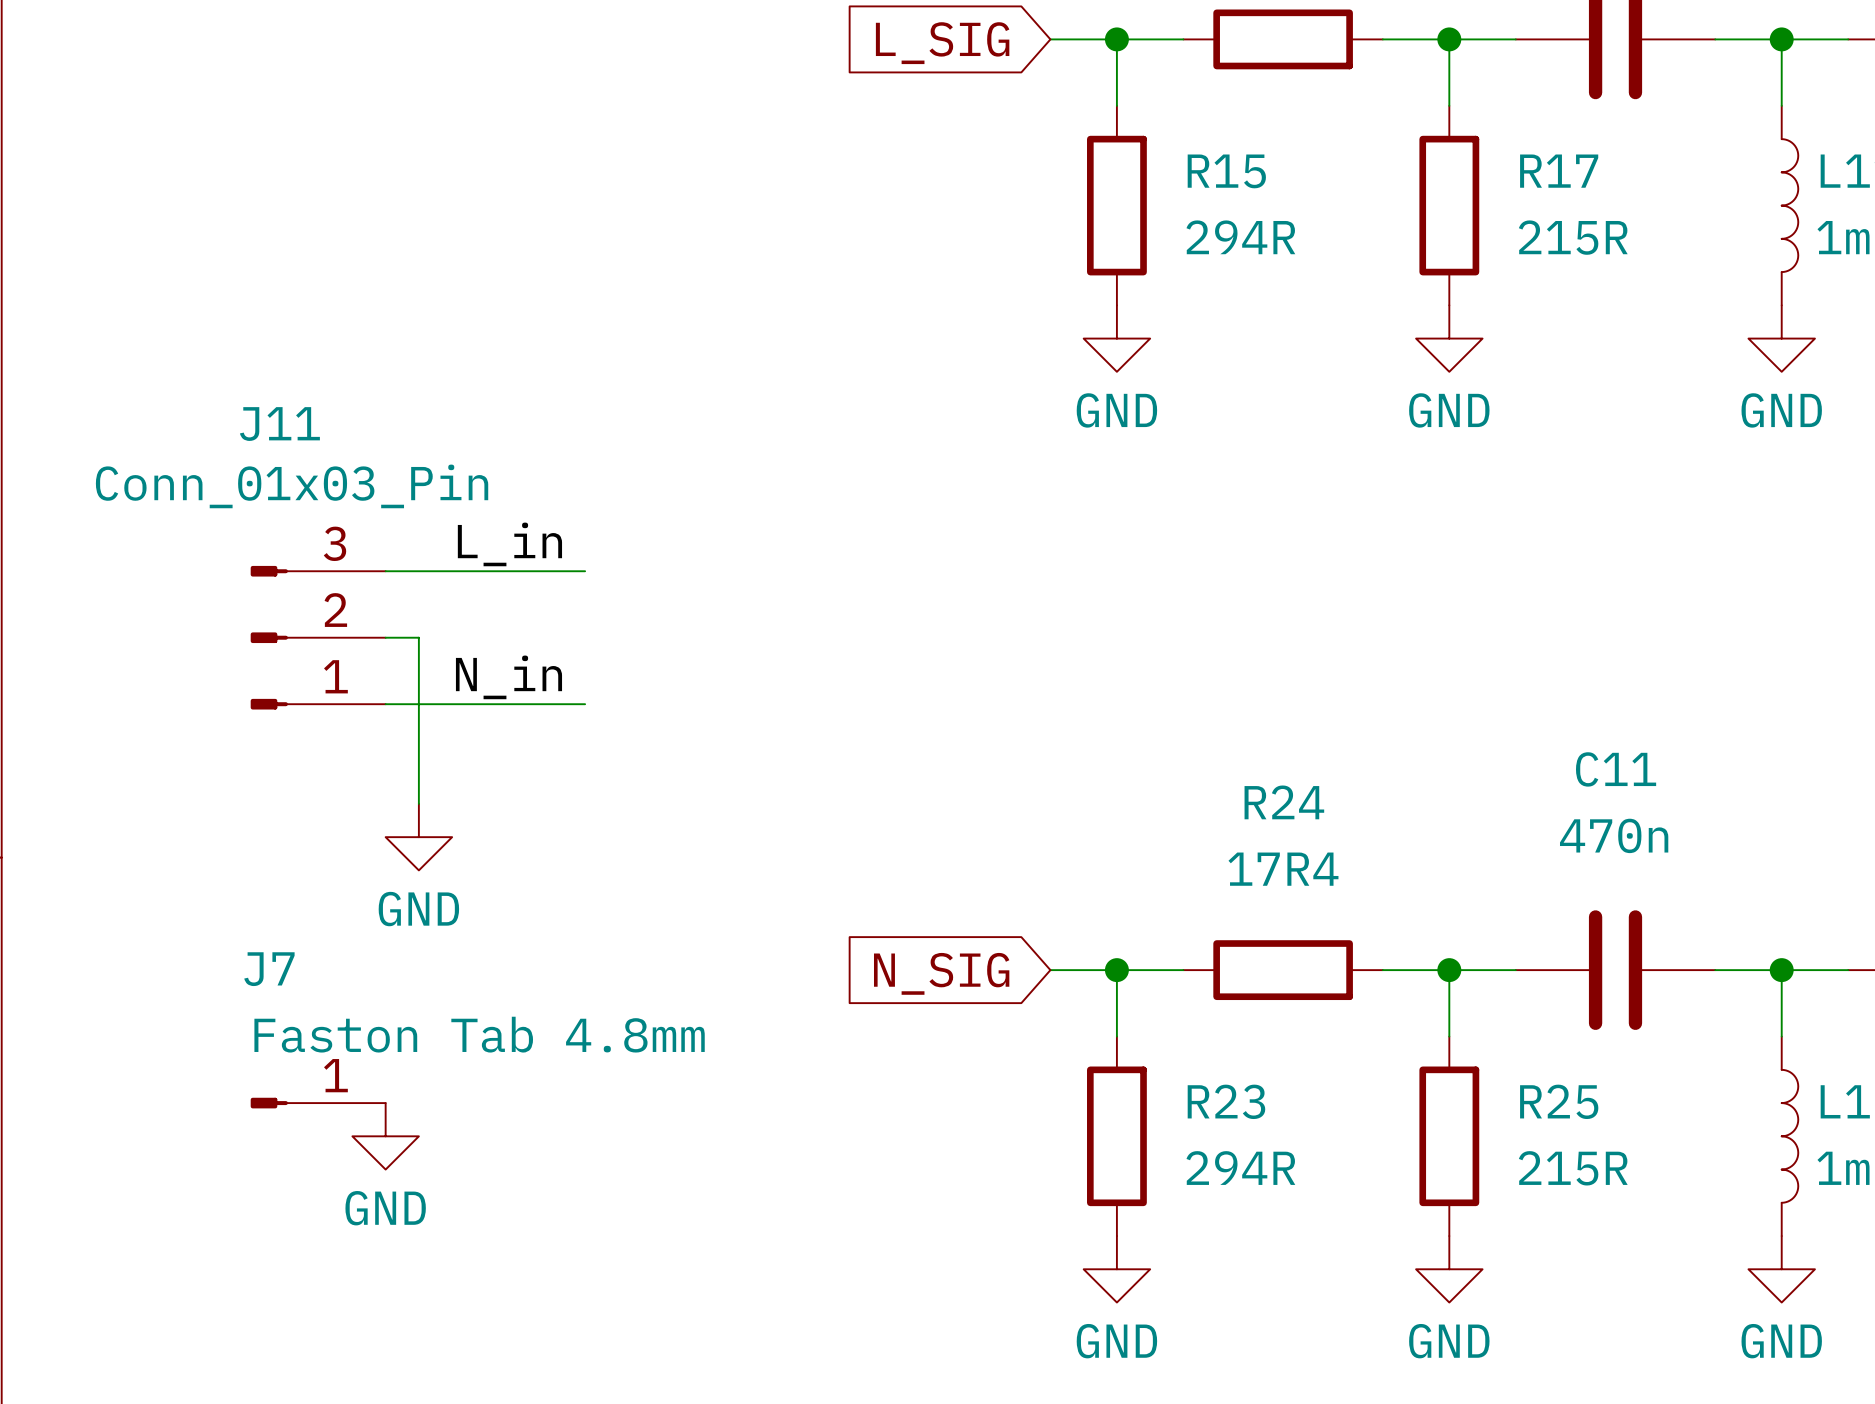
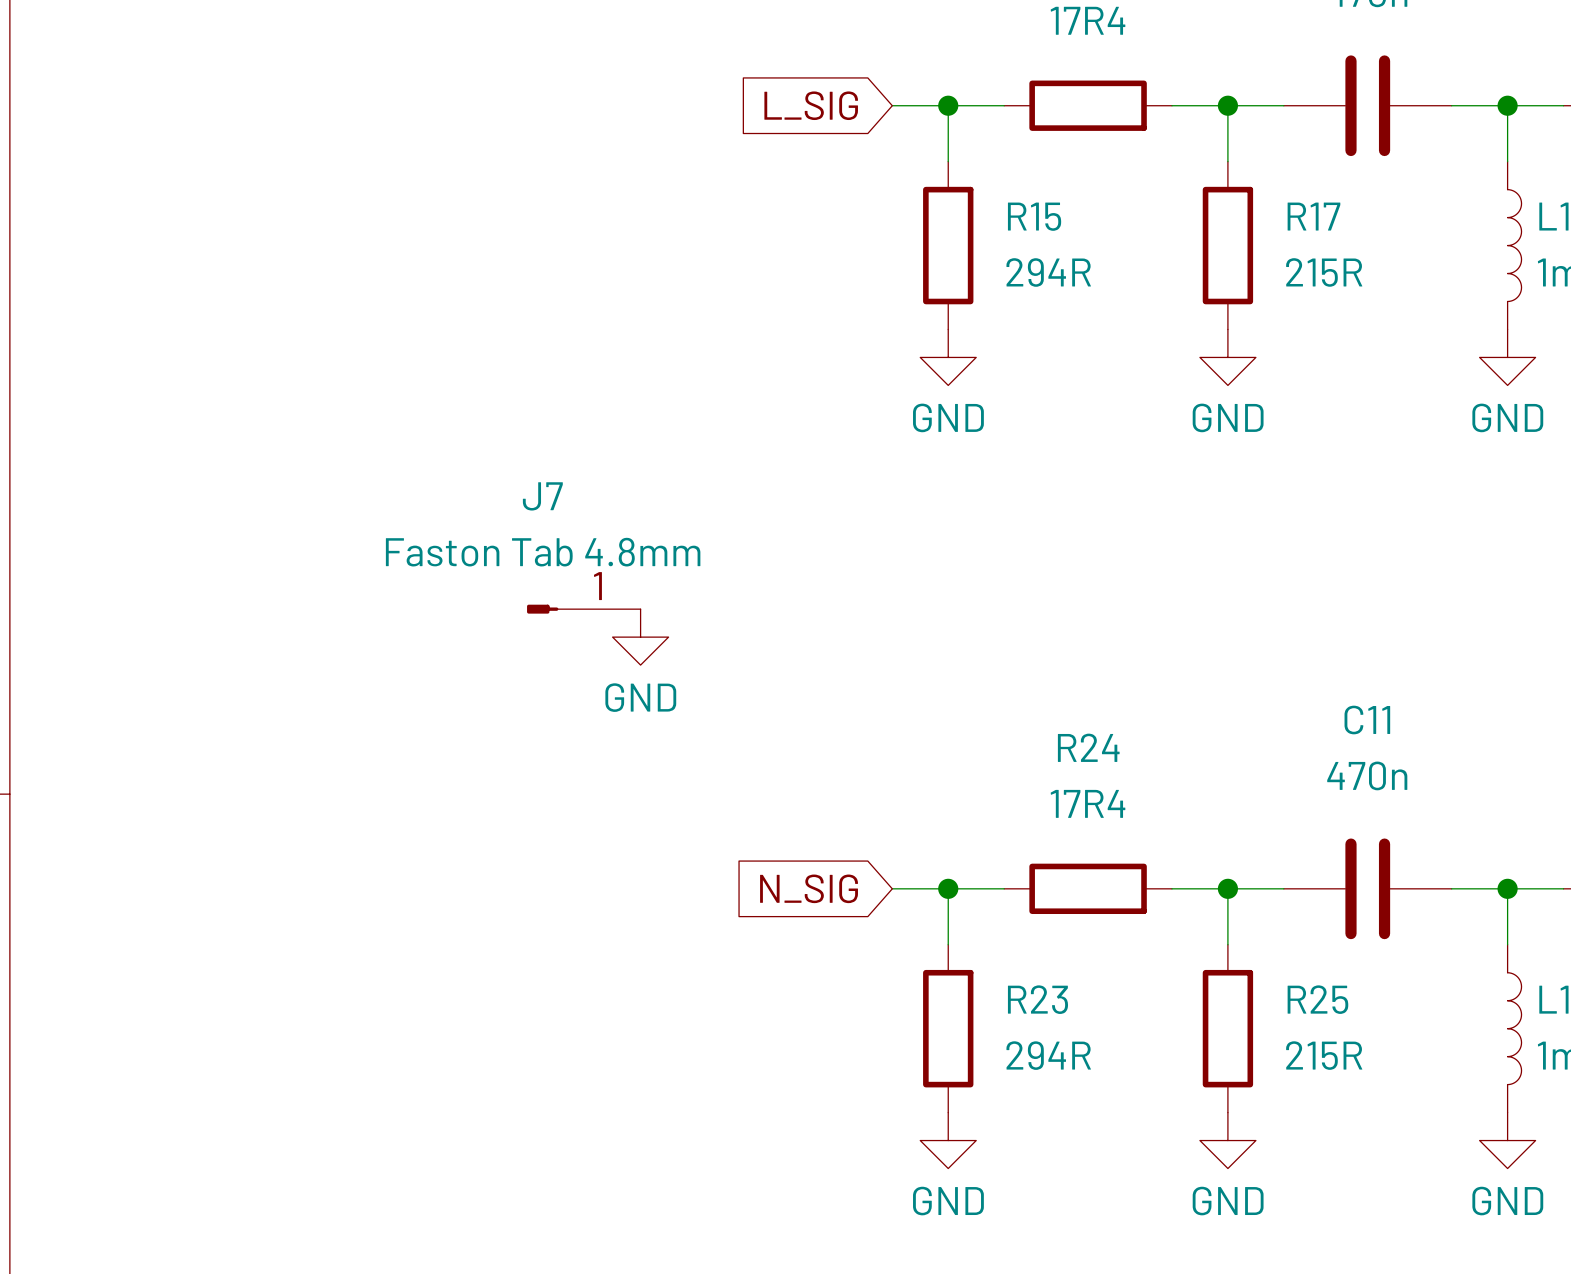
label: L_in (509, 544) -> none
wire: (385, 571) (585, 571) -> none
J11: Conn_01x03_Pin (318, 637) -> none
wire: (385, 637) (418, 637) (418, 803) -> none
power symbol: none -> GND (640, 637)
label: N_in (508, 677) -> none
wire: (385, 704) (585, 704) -> none
power symbol: GND (418, 837) -> none
J7 value position: Faston Tab 4.8mm (479, 1034) -> Faston Tab 4.8mm (543, 552)
J7 position: (318, 1103) -> (583, 609)
power symbol: GND (385, 1136) -> none

